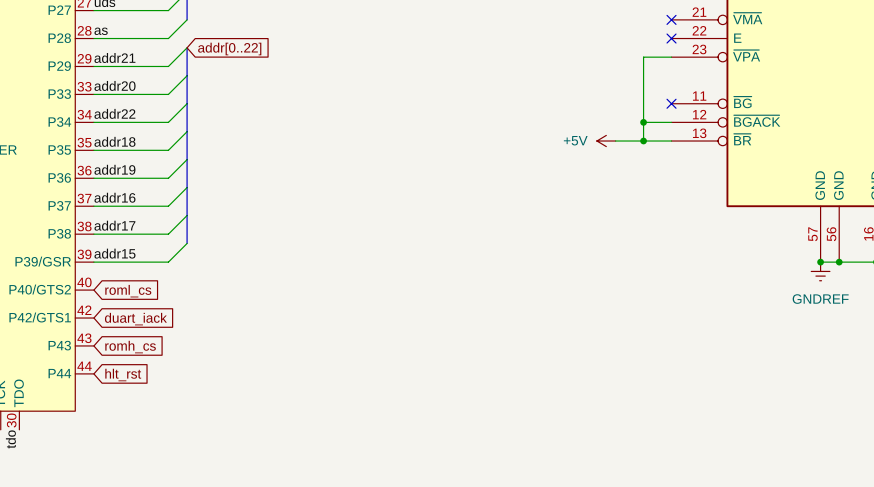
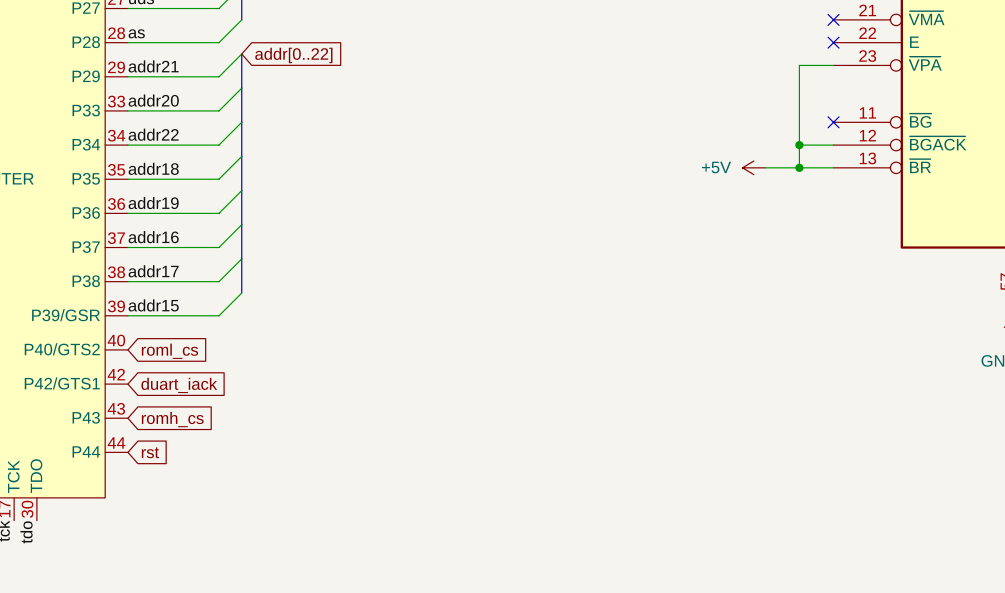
global label: hlt_rst (123, 375) -> rst (150, 452)

